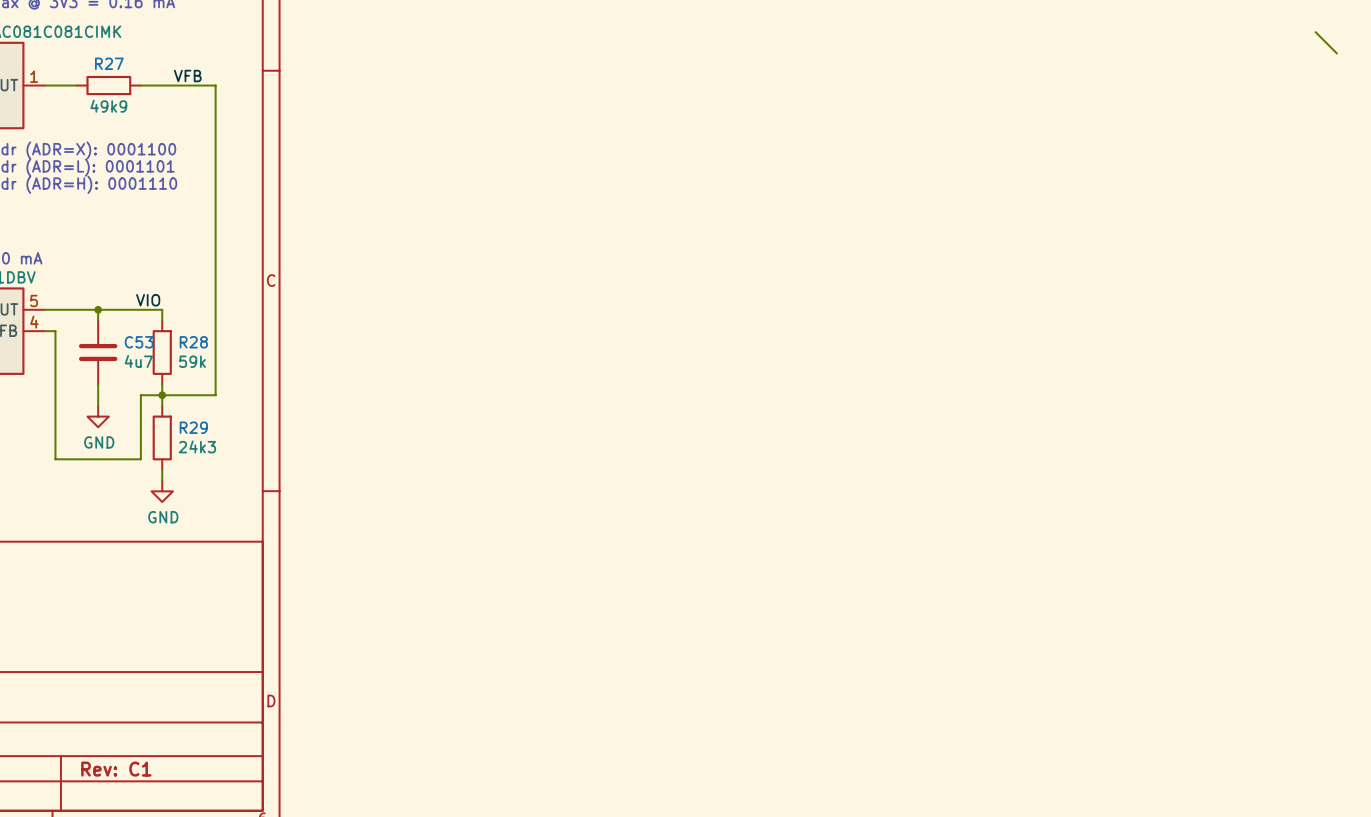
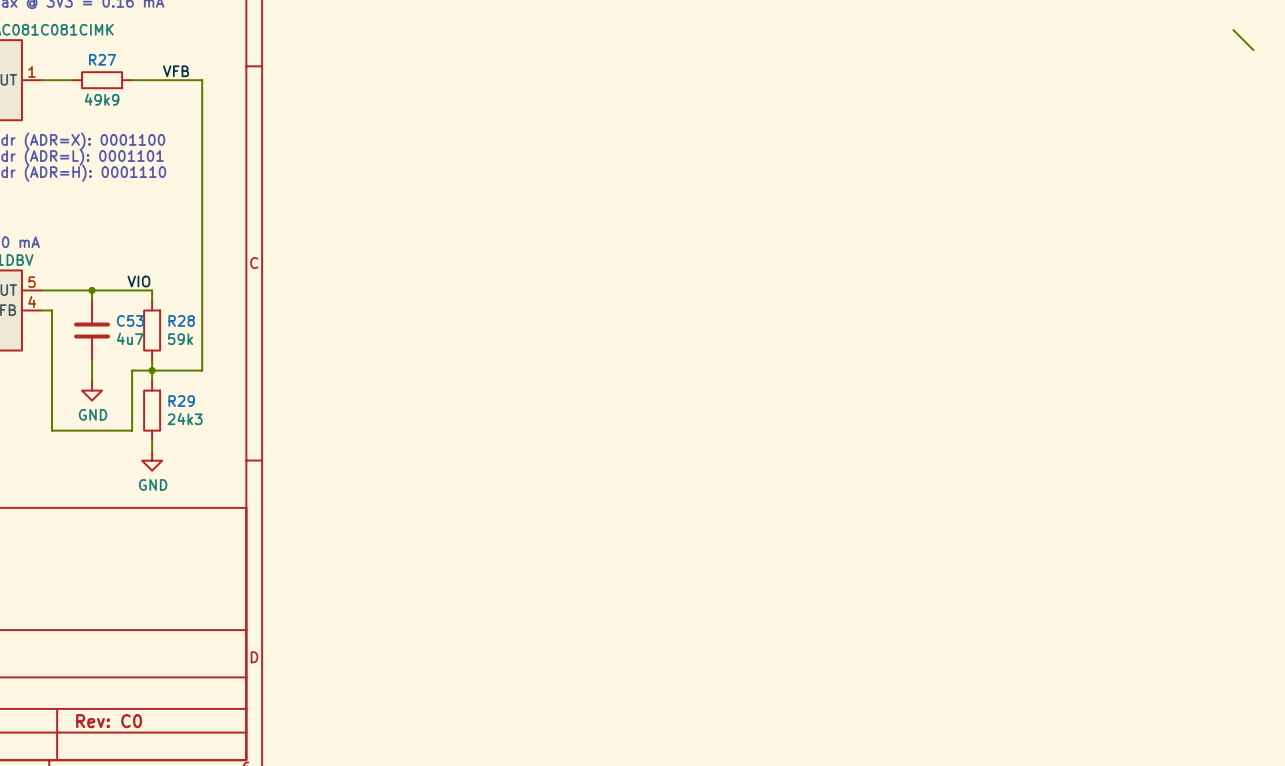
title block: Rev: C1 (116, 769) -> Rev: C0 (109, 721)

